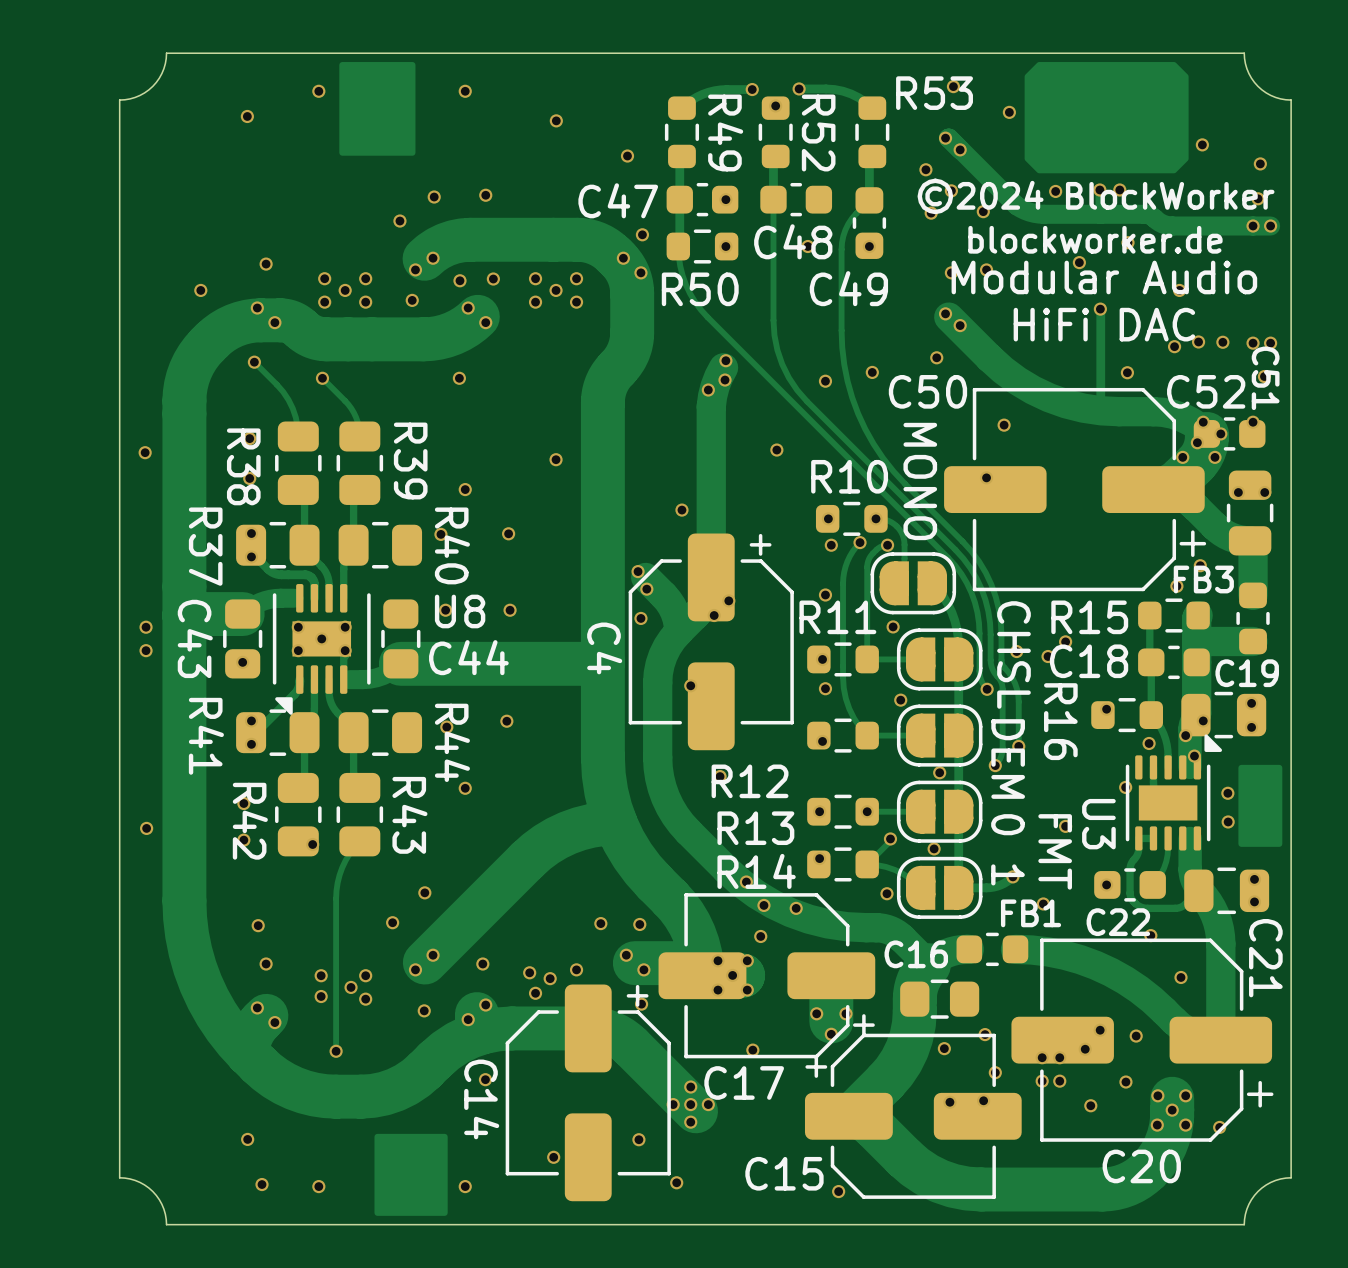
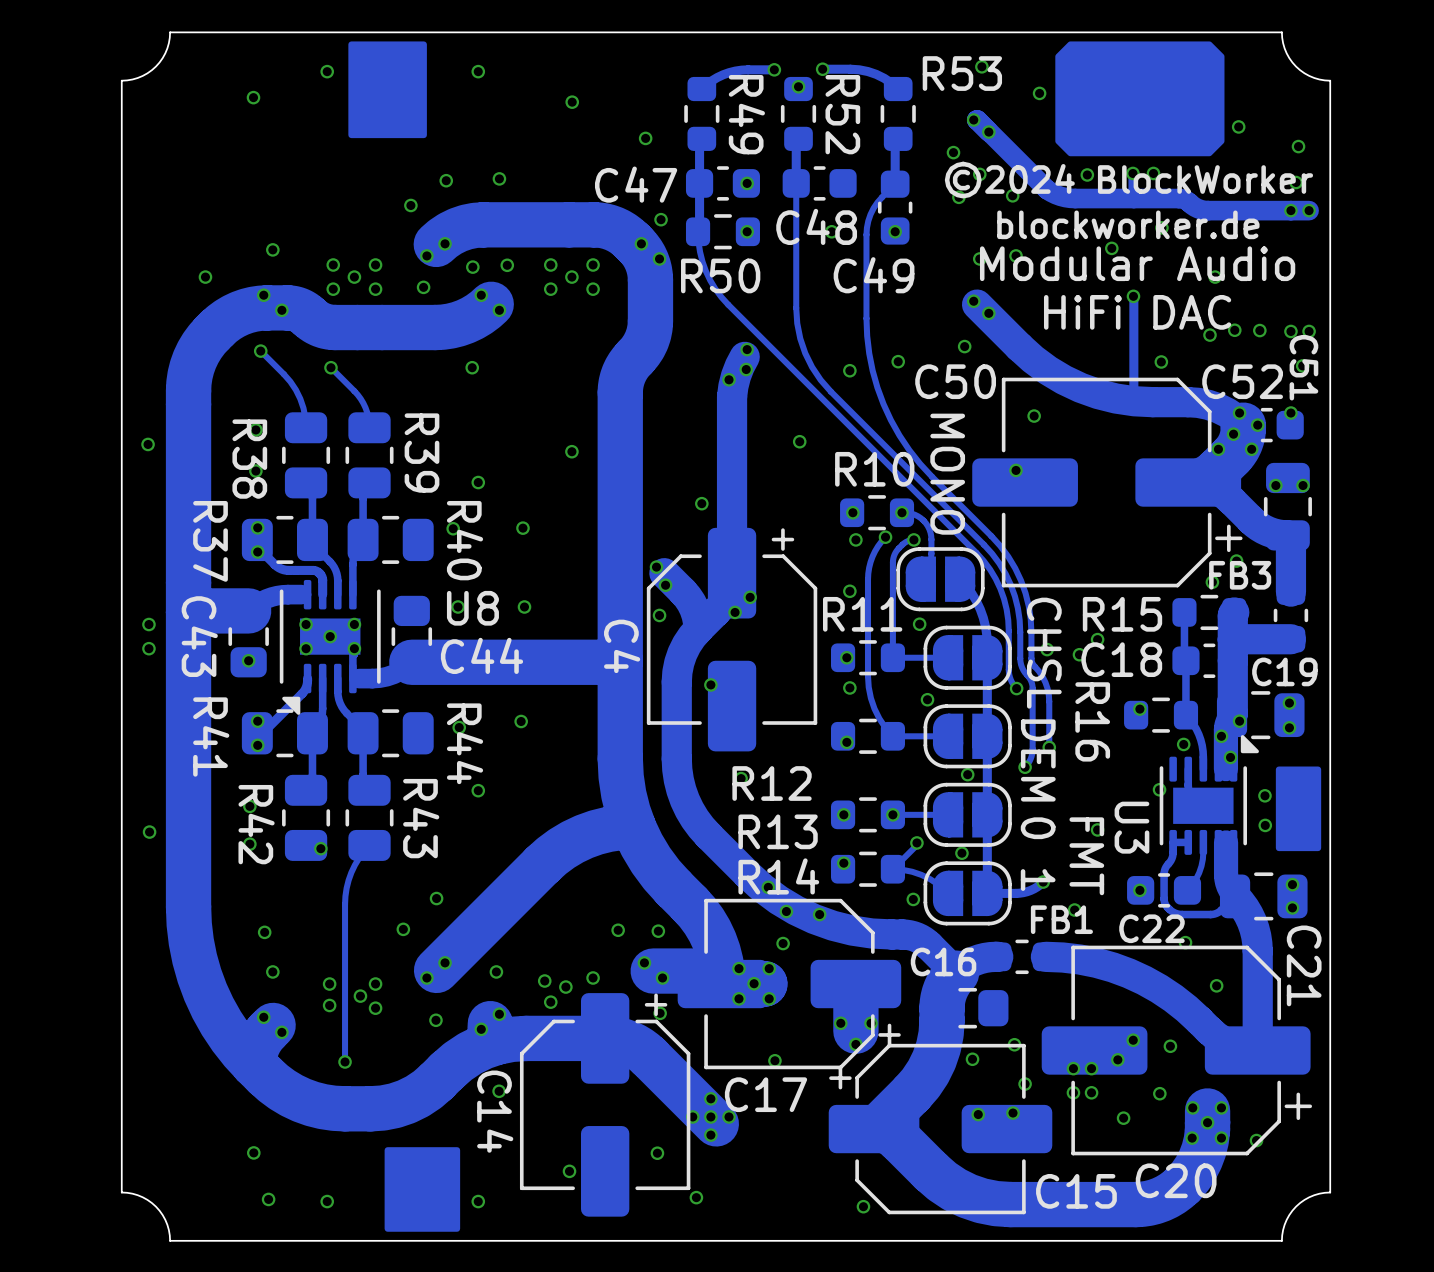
C15 name position: C15 (784, 1173) -> C15 (1076, 1191)

